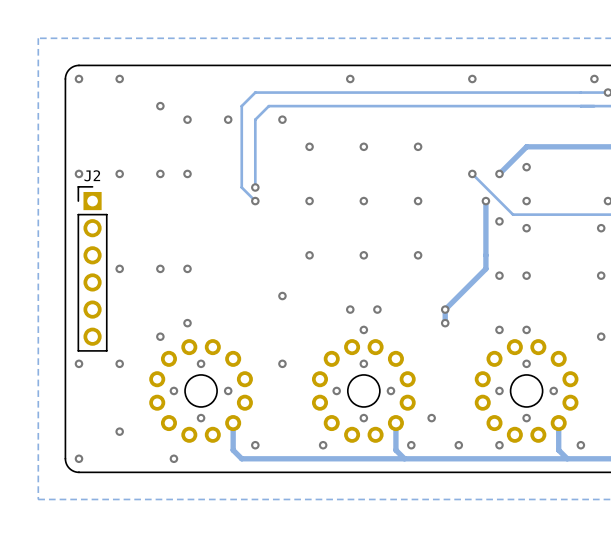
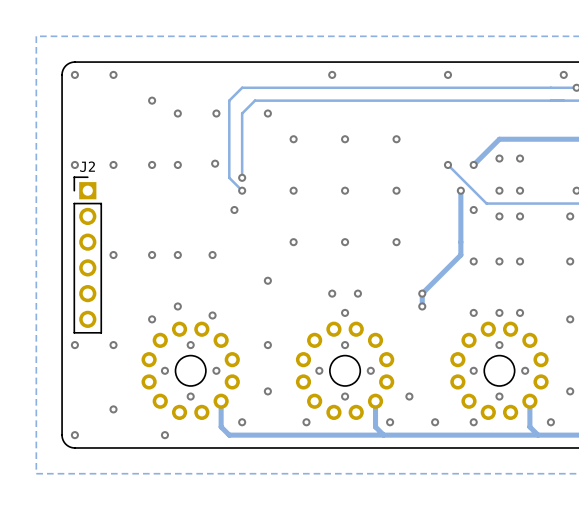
via: none -> (520, 158)
via: none -> (215, 163)
via: none -> (520, 190)
via: none -> (234, 209)
via: none -> (520, 216)
via: none -> (212, 255)
via: none -> (520, 261)
via: none -> (520, 312)
via: none -> (212, 315)
via: none -> (267, 391)
via: none -> (570, 391)

